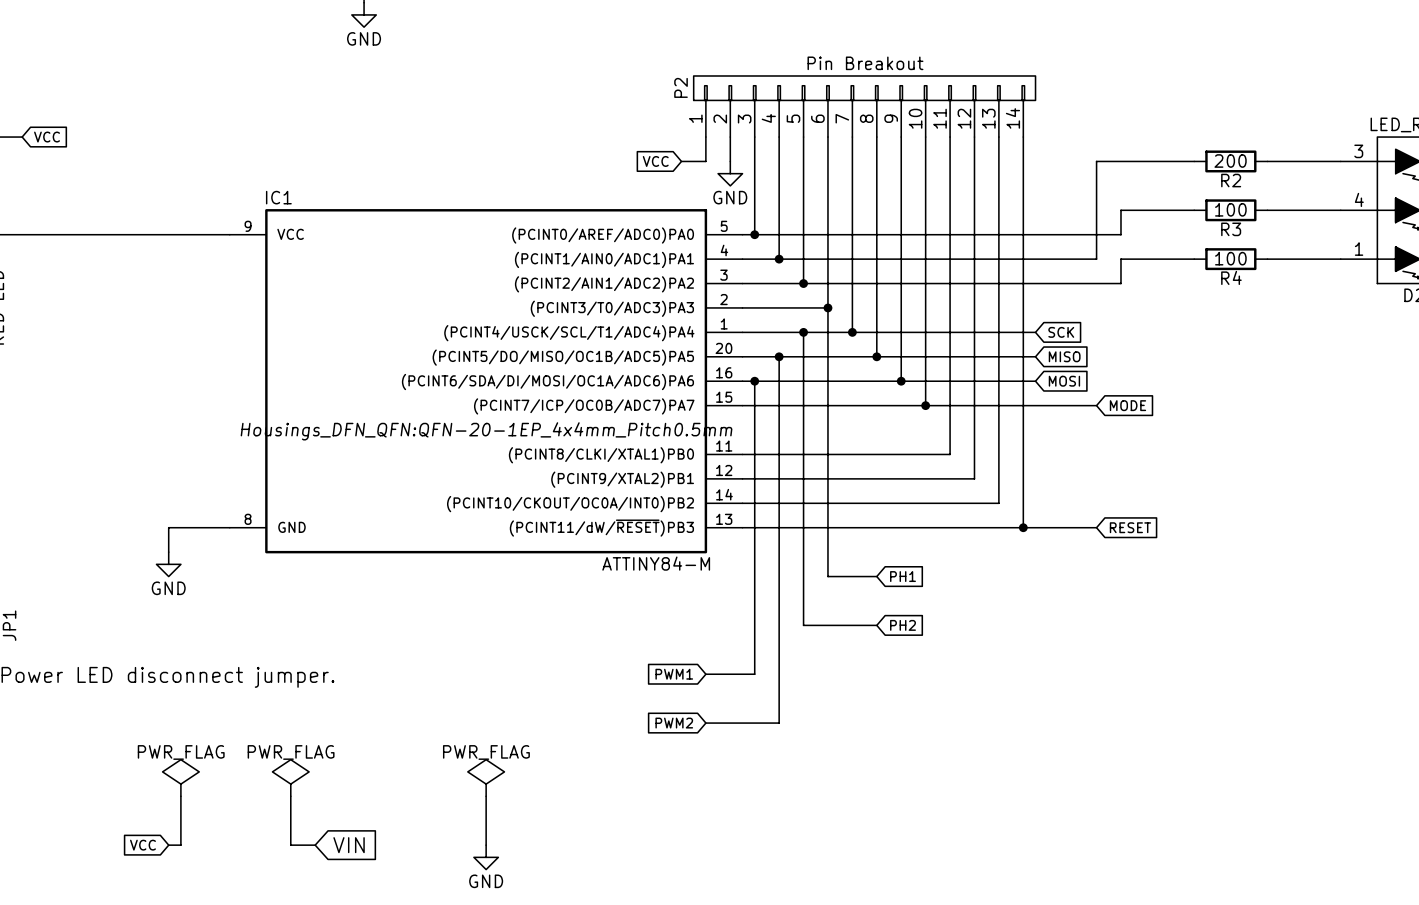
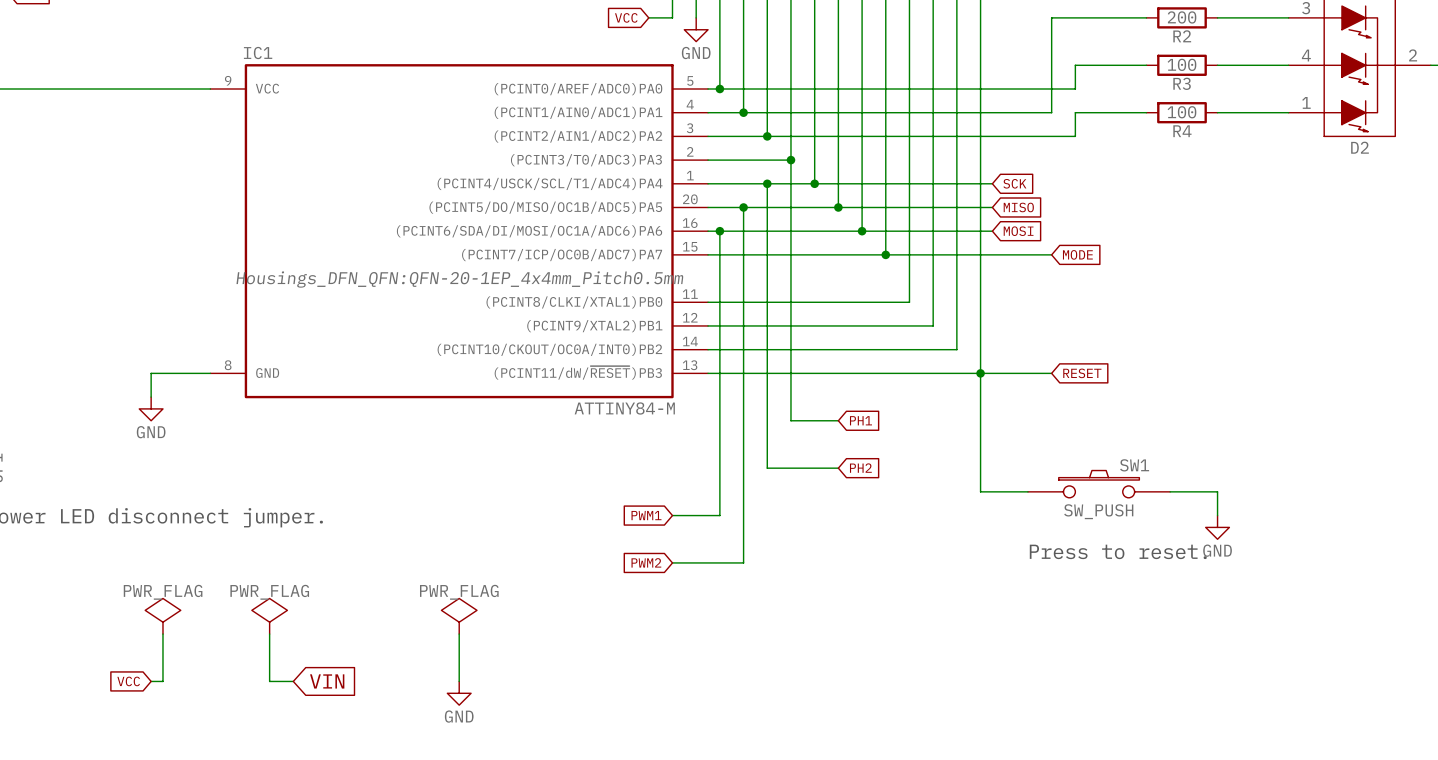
wire: none -> (980, 373) (980, 491) (1027, 491)
SW1: none -> SW_PUSH (1099, 484)
wire: none -> (1170, 491) (1217, 491) (1217, 515)
power symbol: none -> GND (1217, 527)
text: none -> Press to reset. (1118, 551)

